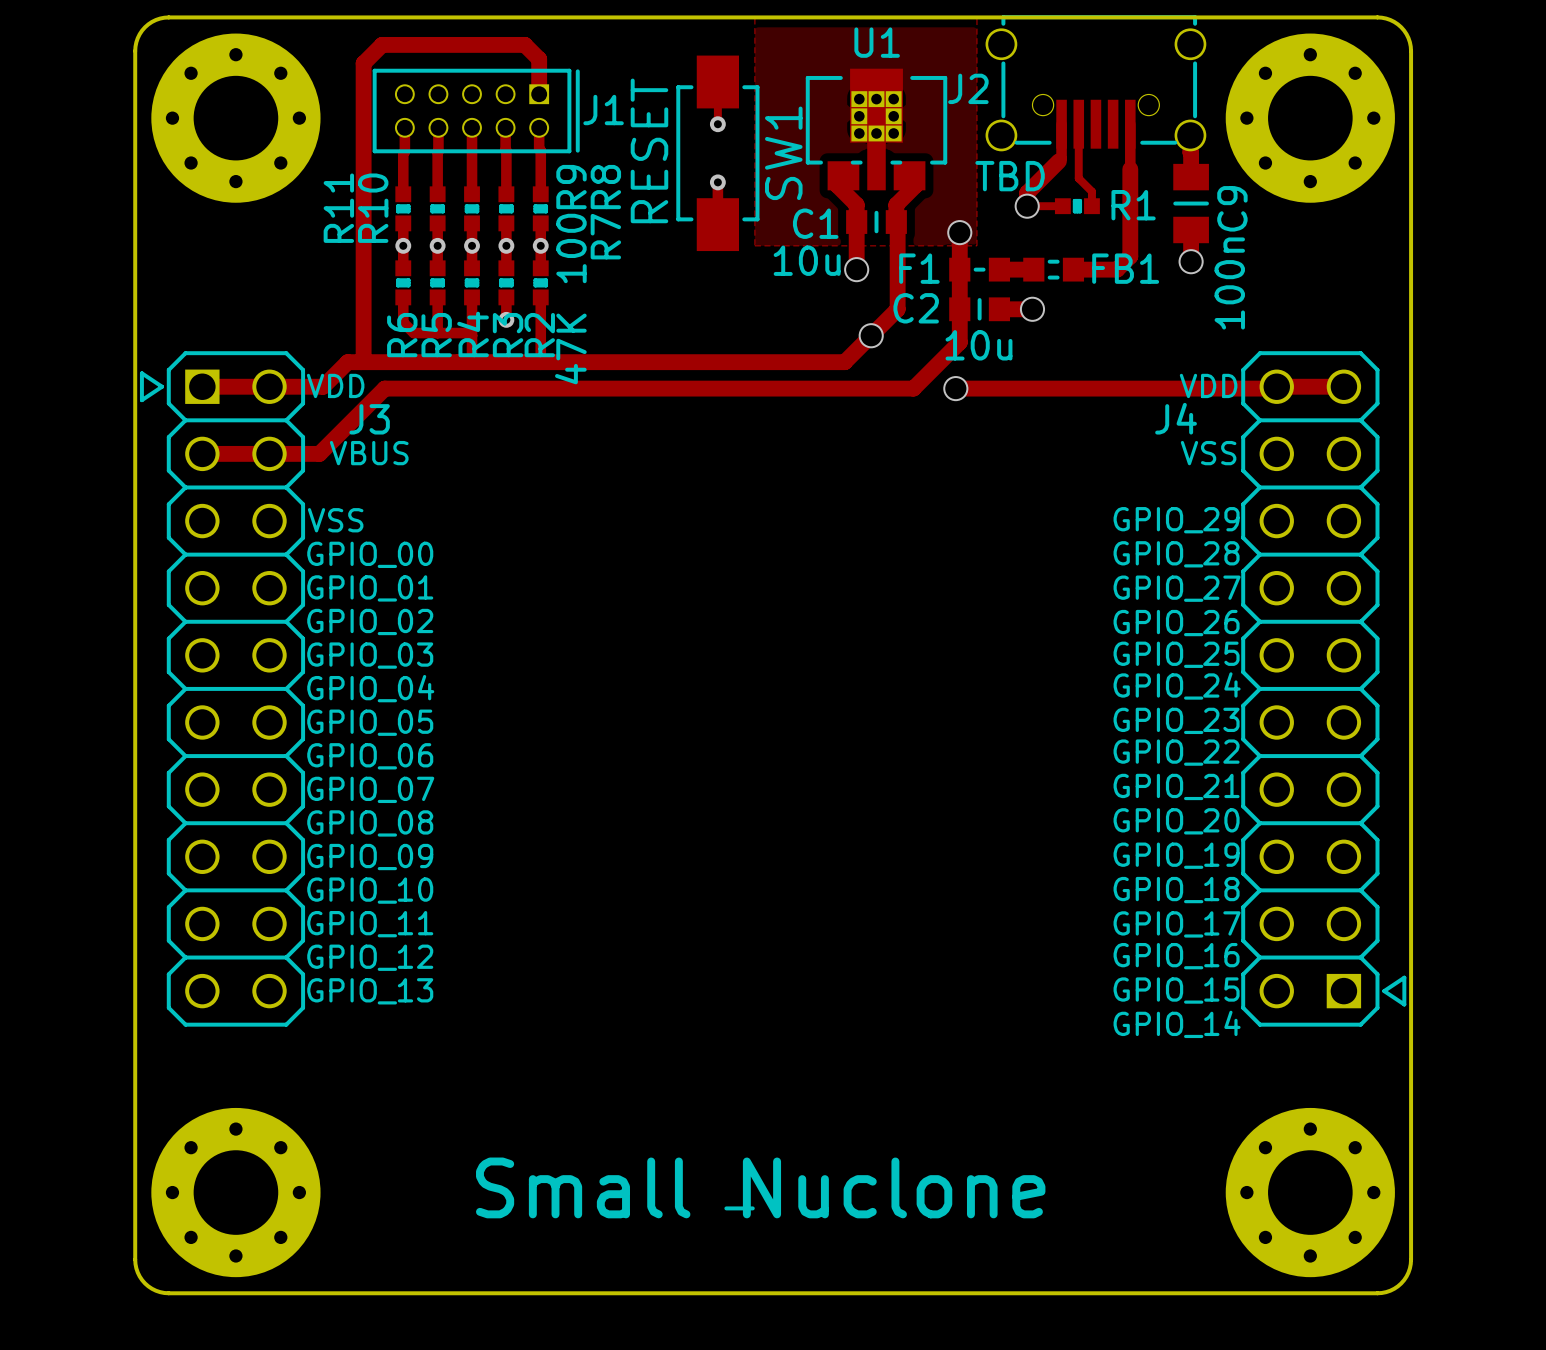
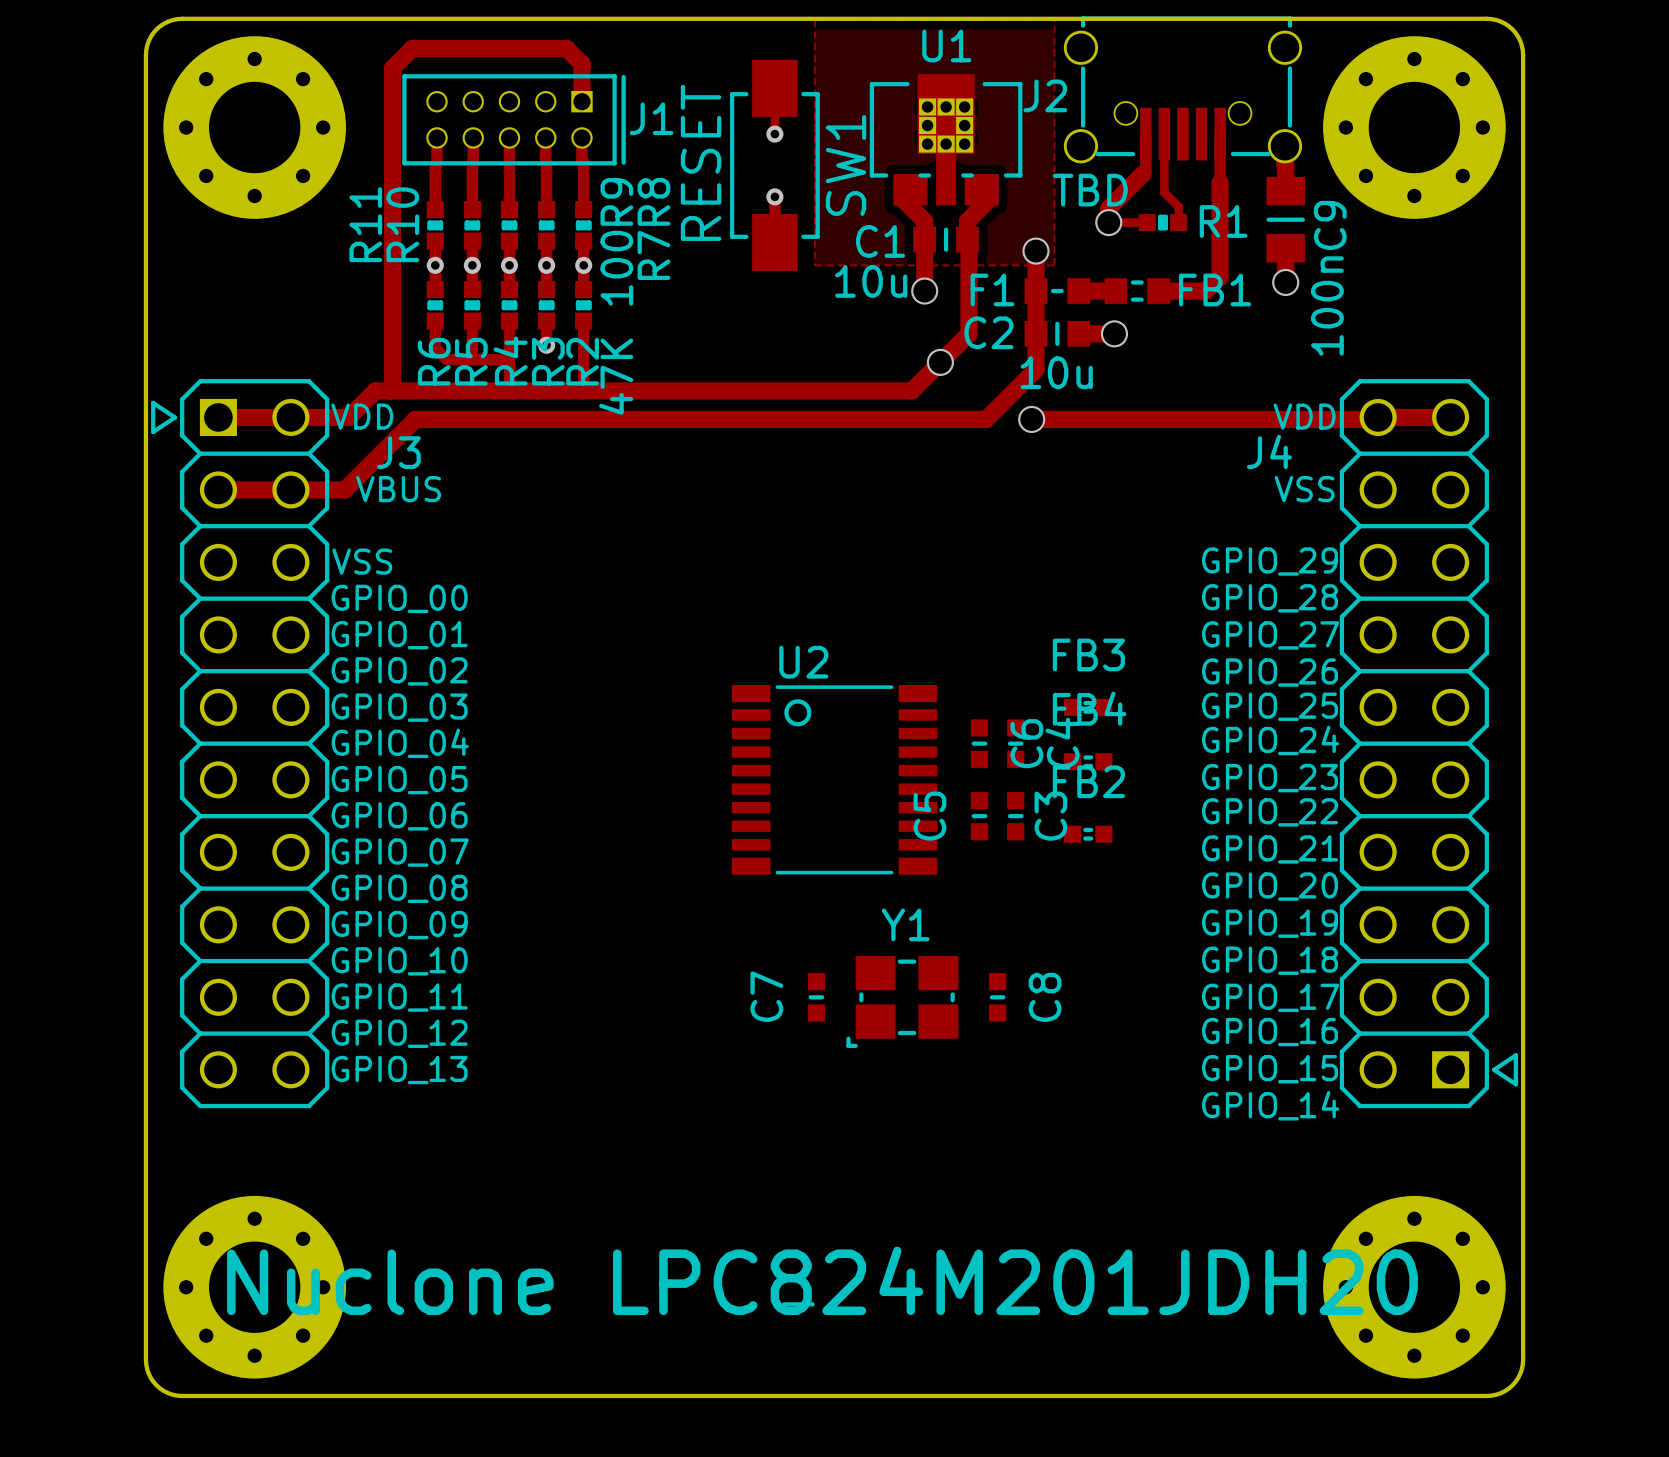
FB3: none -> (1088, 707)
C6: none -> (979, 743)
C4: none -> (1015, 743)
FB4: none -> (1088, 761)
U2: none -> (834, 779)
C5: none -> (979, 816)
C3: none -> (1015, 816)
FB2: none -> (1088, 834)
C7: none -> (816, 997)
C8: none -> (997, 997)
Y1: none -> (902, 1001)
drawing shape: [476, 1157, 1046, 1219] -> [227, 1246, 1418, 1316]

